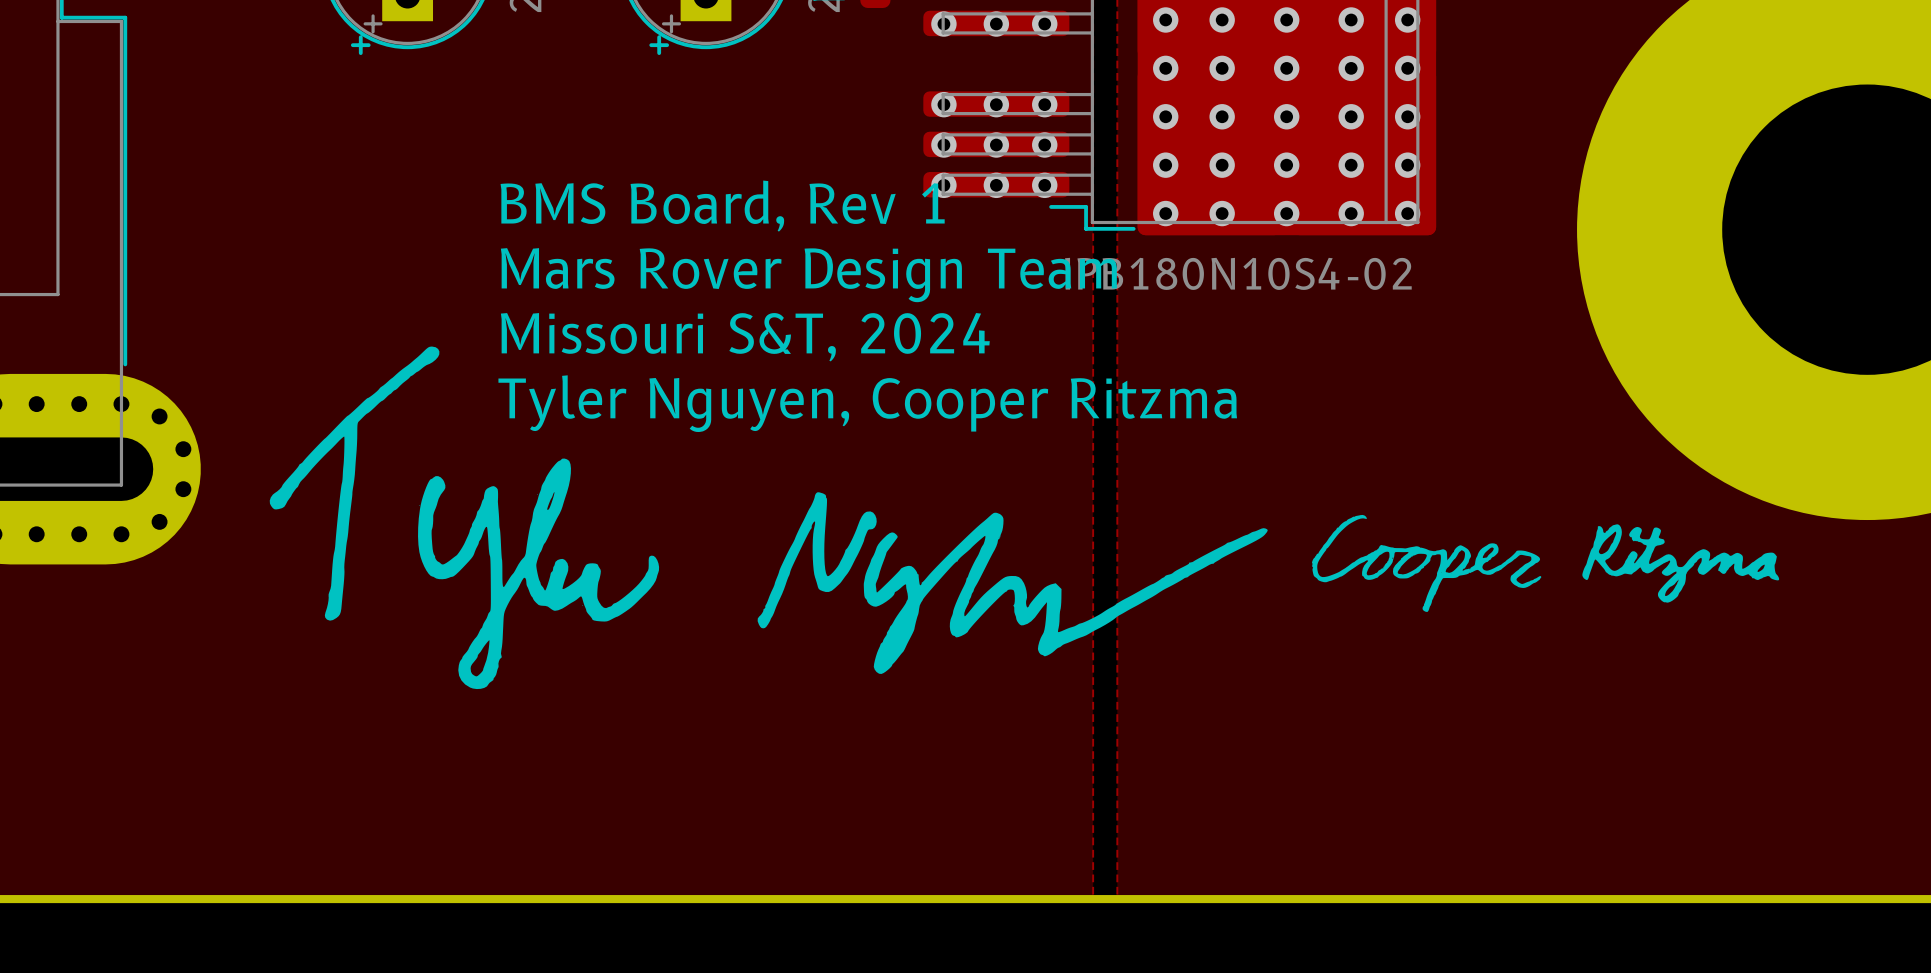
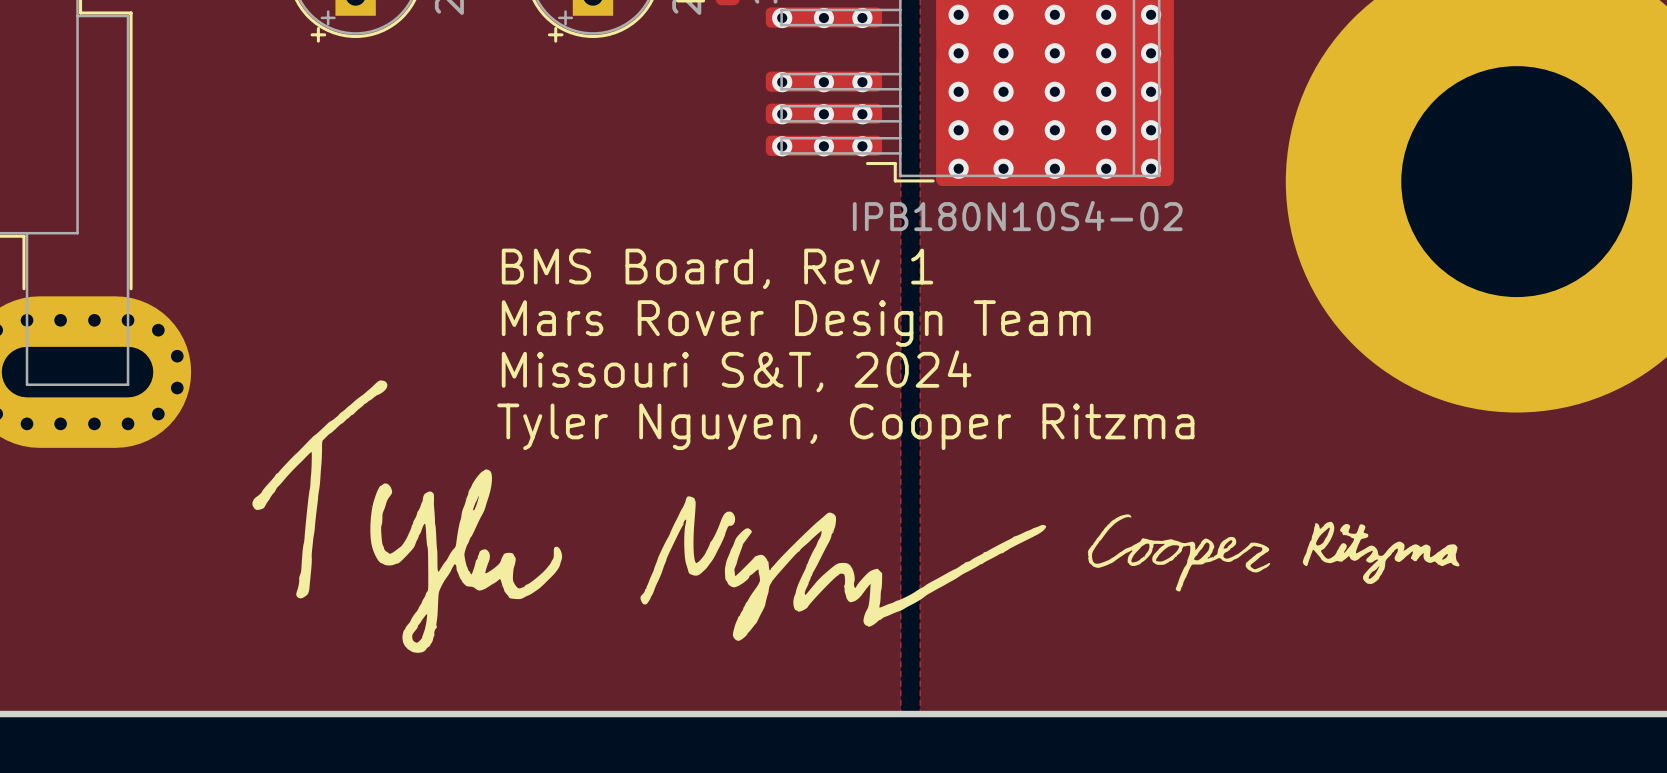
text position: BMS Board, Rev 1 (722, 206) -> BMS Board, Rev 1 (717, 268)
text position: Mars Rover Design Team (808, 275) -> Mars Rover Design Team (796, 323)
text position: Missouri S&T, 2024 (745, 337) -> Missouri S&T, 2024 (736, 371)
text position: Tyler Nguyen, Cooper Ritzma (867, 403) -> Tyler Nguyen, Cooper Ritzma (845, 426)
drawing position: (768, 517) -> (649, 516)
drawing position: (1545, 563) -> (1273, 552)

